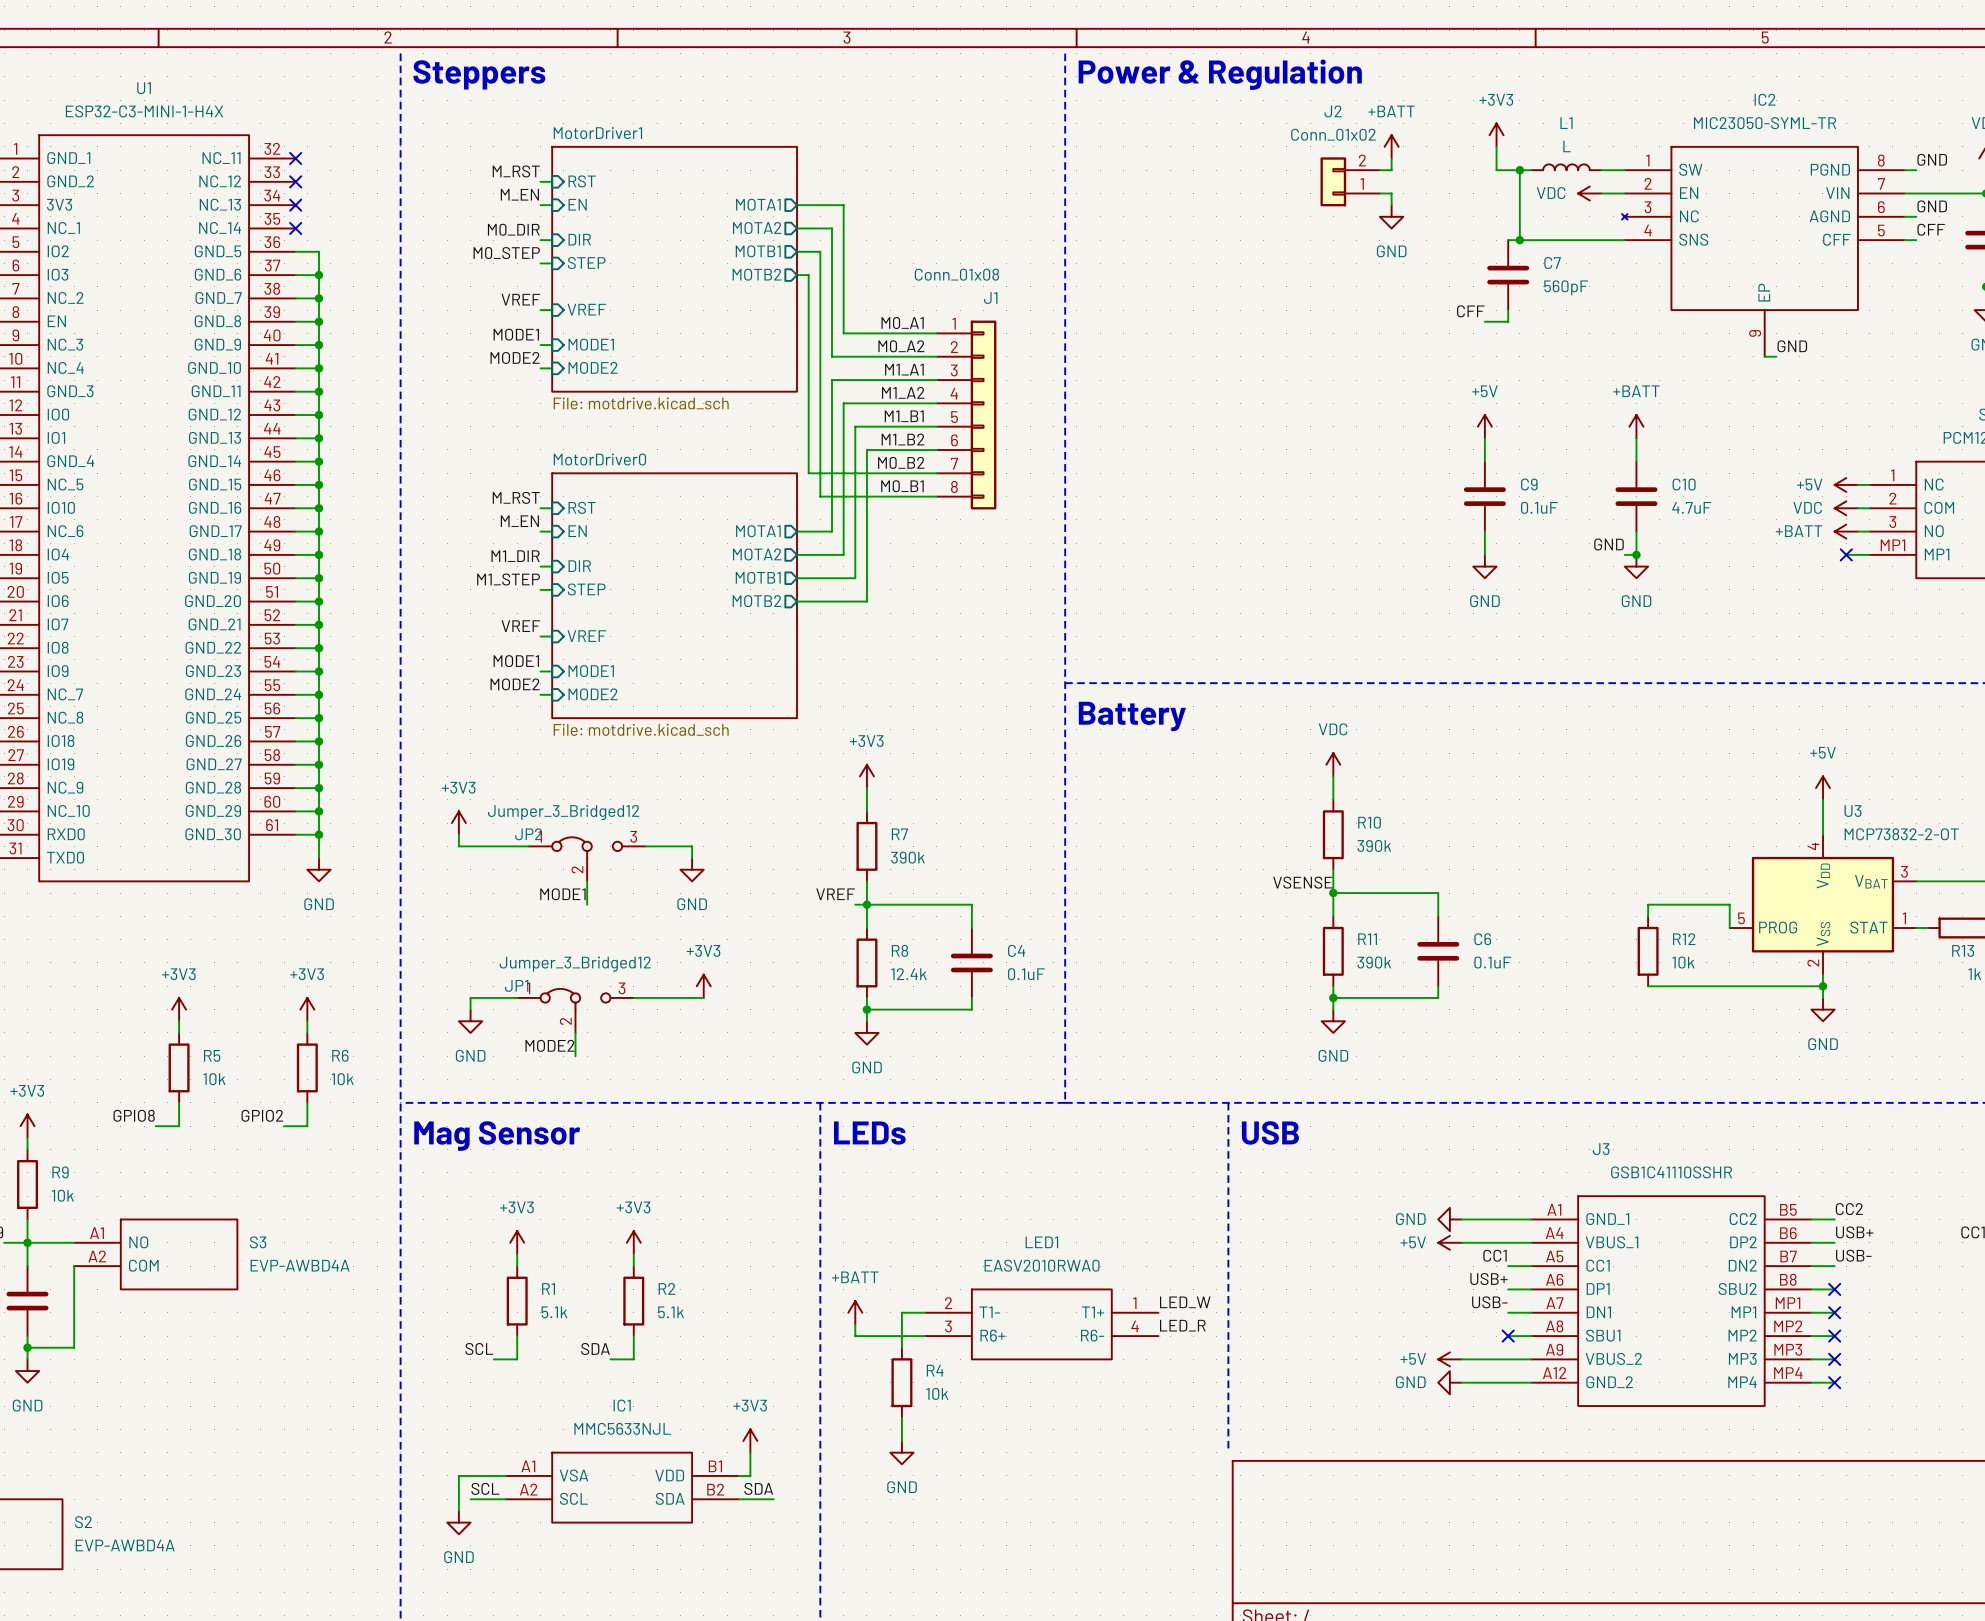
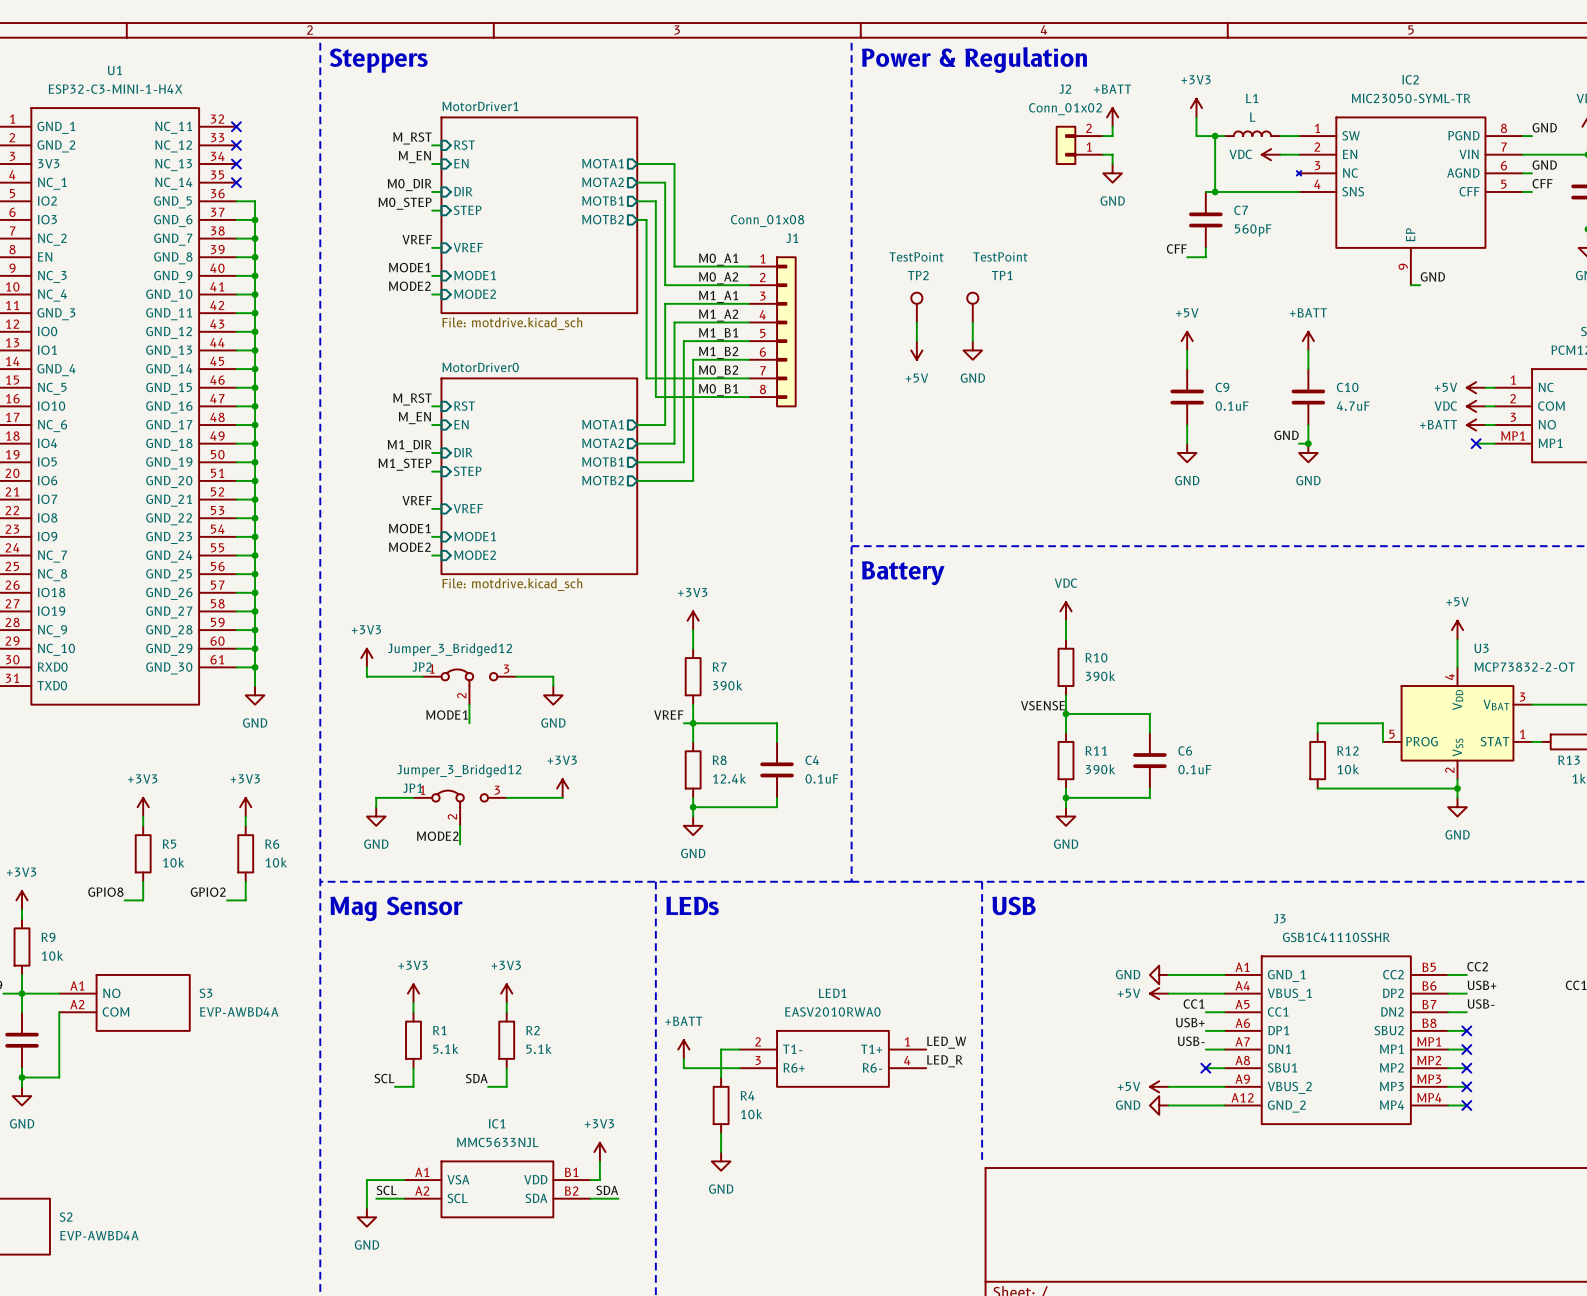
TP2: none -> TestPoint (916, 307)
TP1: none -> TestPoint (972, 307)
wire: none -> (916, 322) (916, 341)
wire: none -> (972, 322) (972, 341)
power symbol: none -> +5V (916, 350)
power symbol: none -> GND (972, 350)

